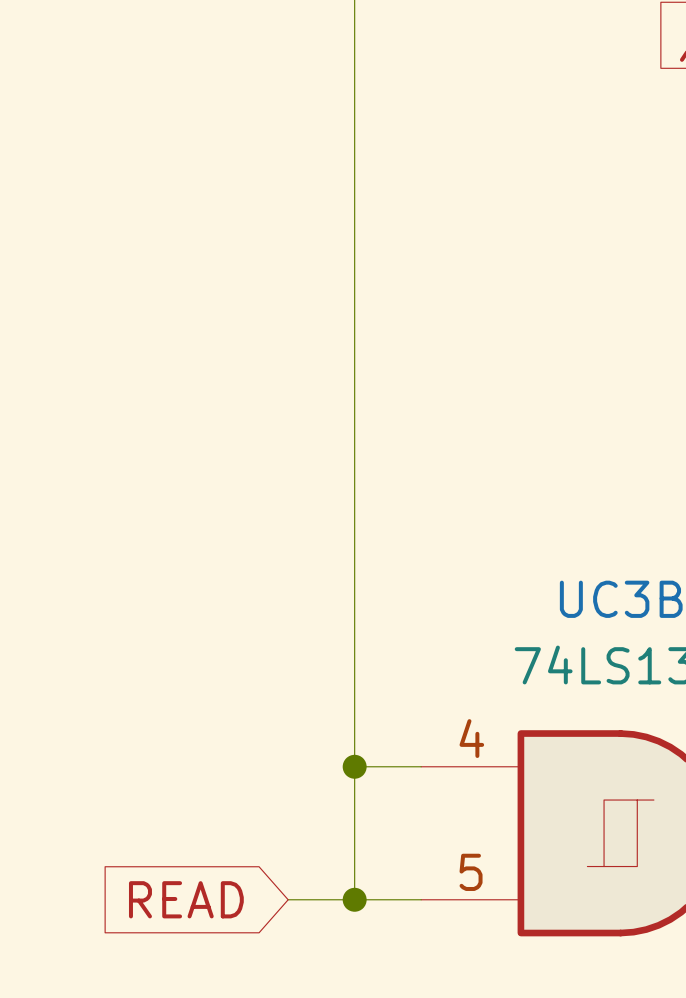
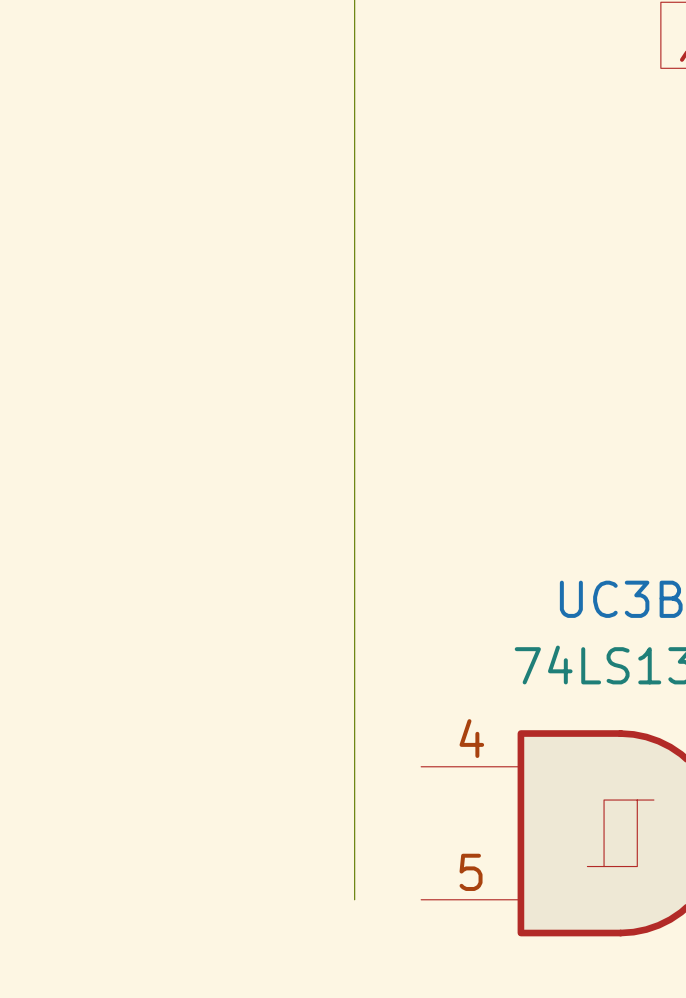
wire: (354, 766) (421, 766) -> none
junction: (354, 766) -> none
global label: READ (186, 899) -> none
wire: (288, 899) (421, 899) -> none
junction: (354, 899) -> none

